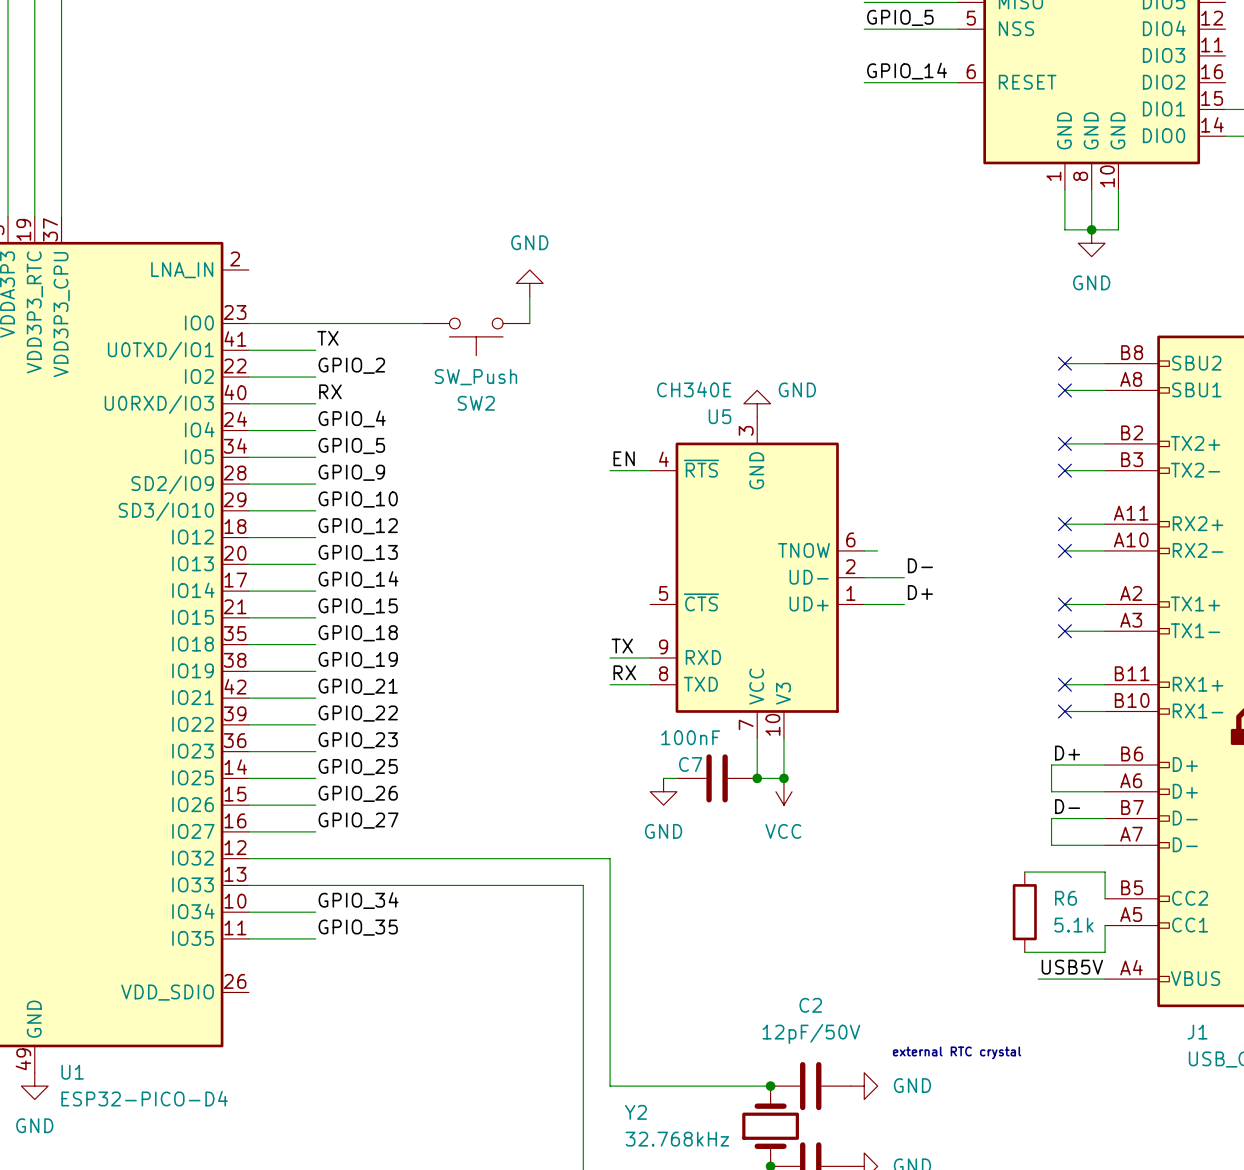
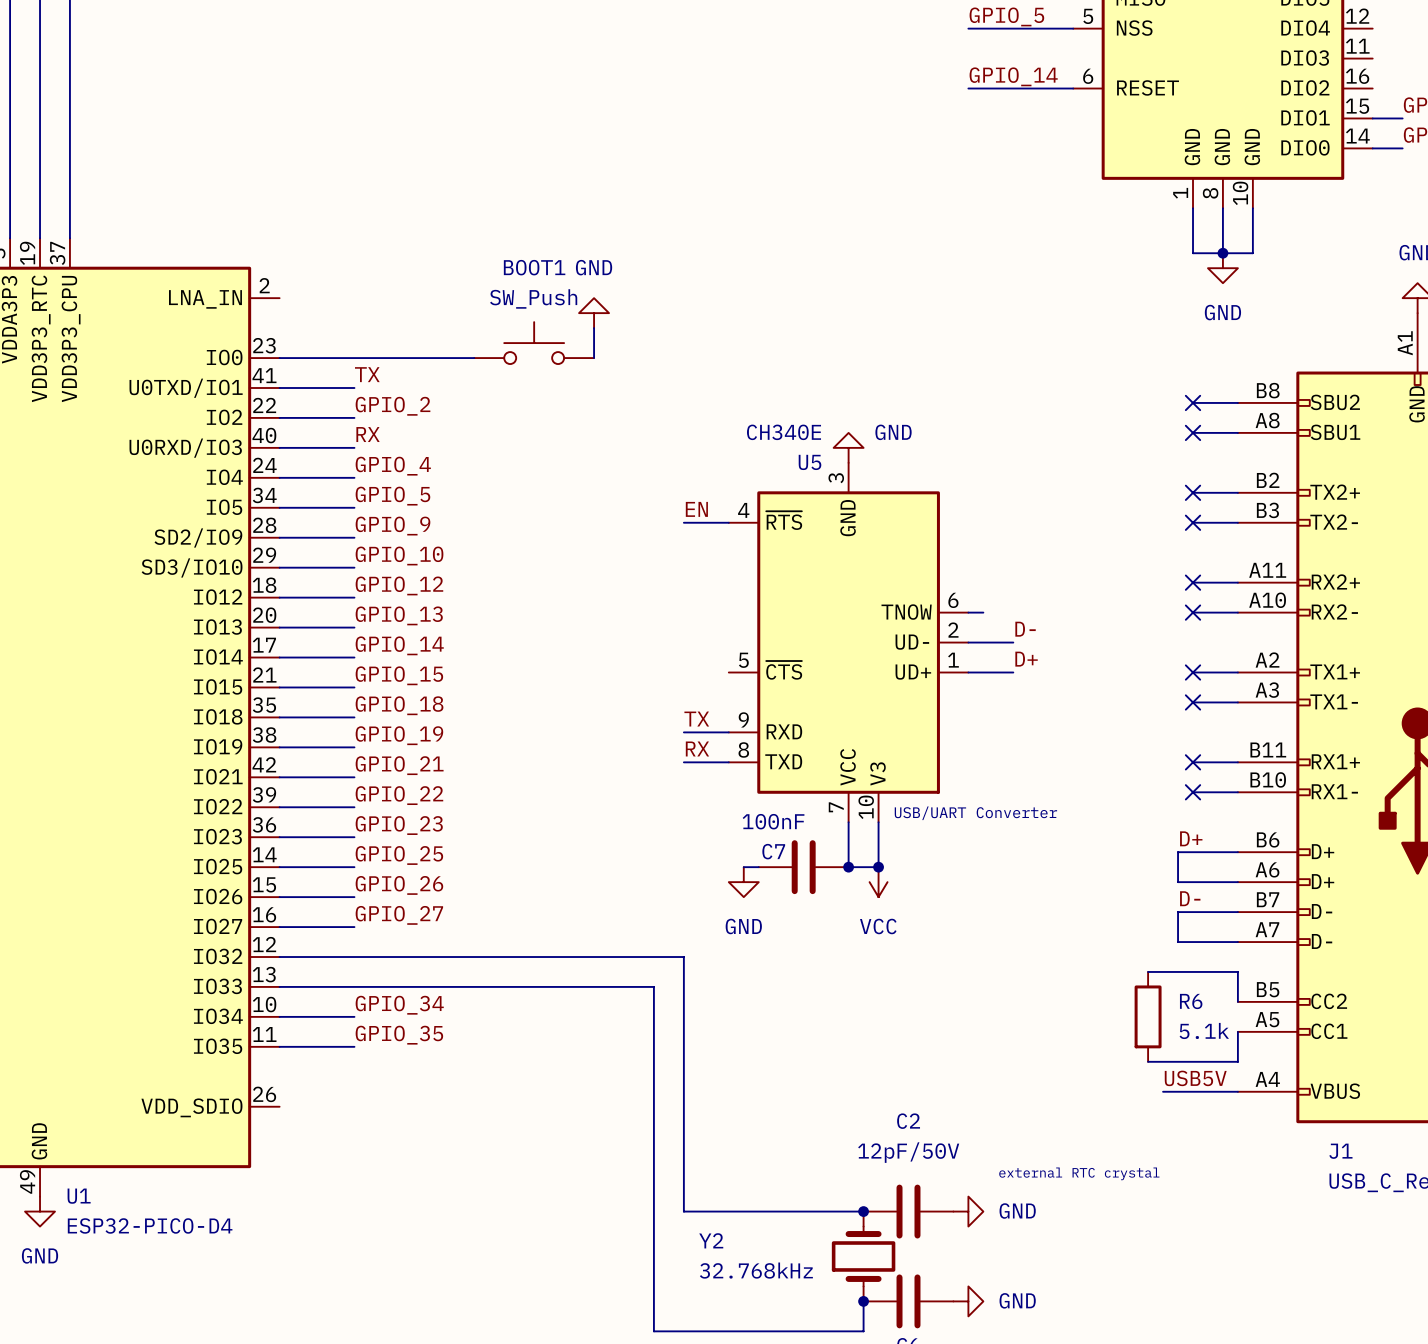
BOOT1: none -> SW_Push (534, 343)
SW2: SW_Push (476, 336) -> none
text: none -> USB/UART Converter (975, 813)

